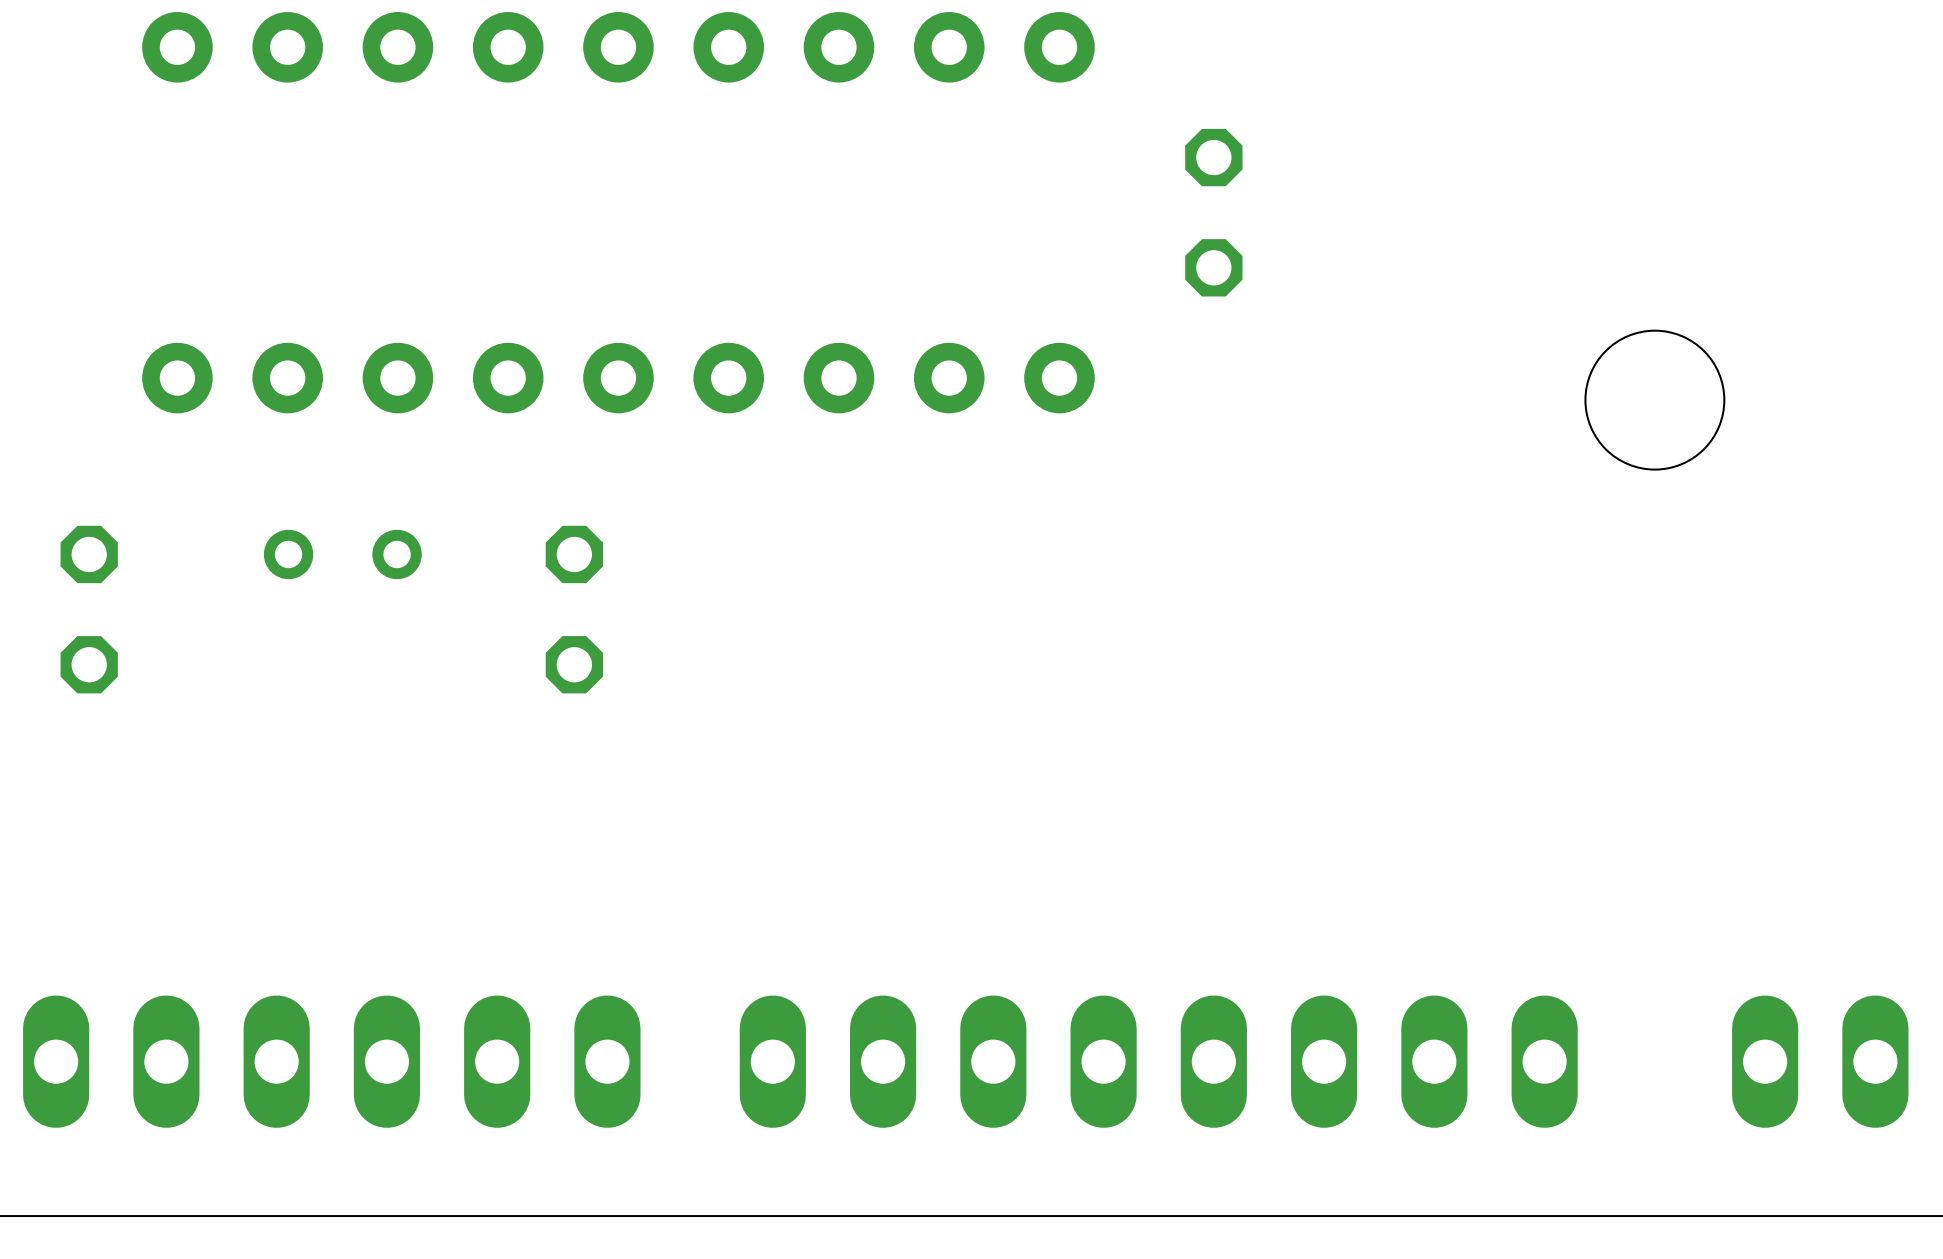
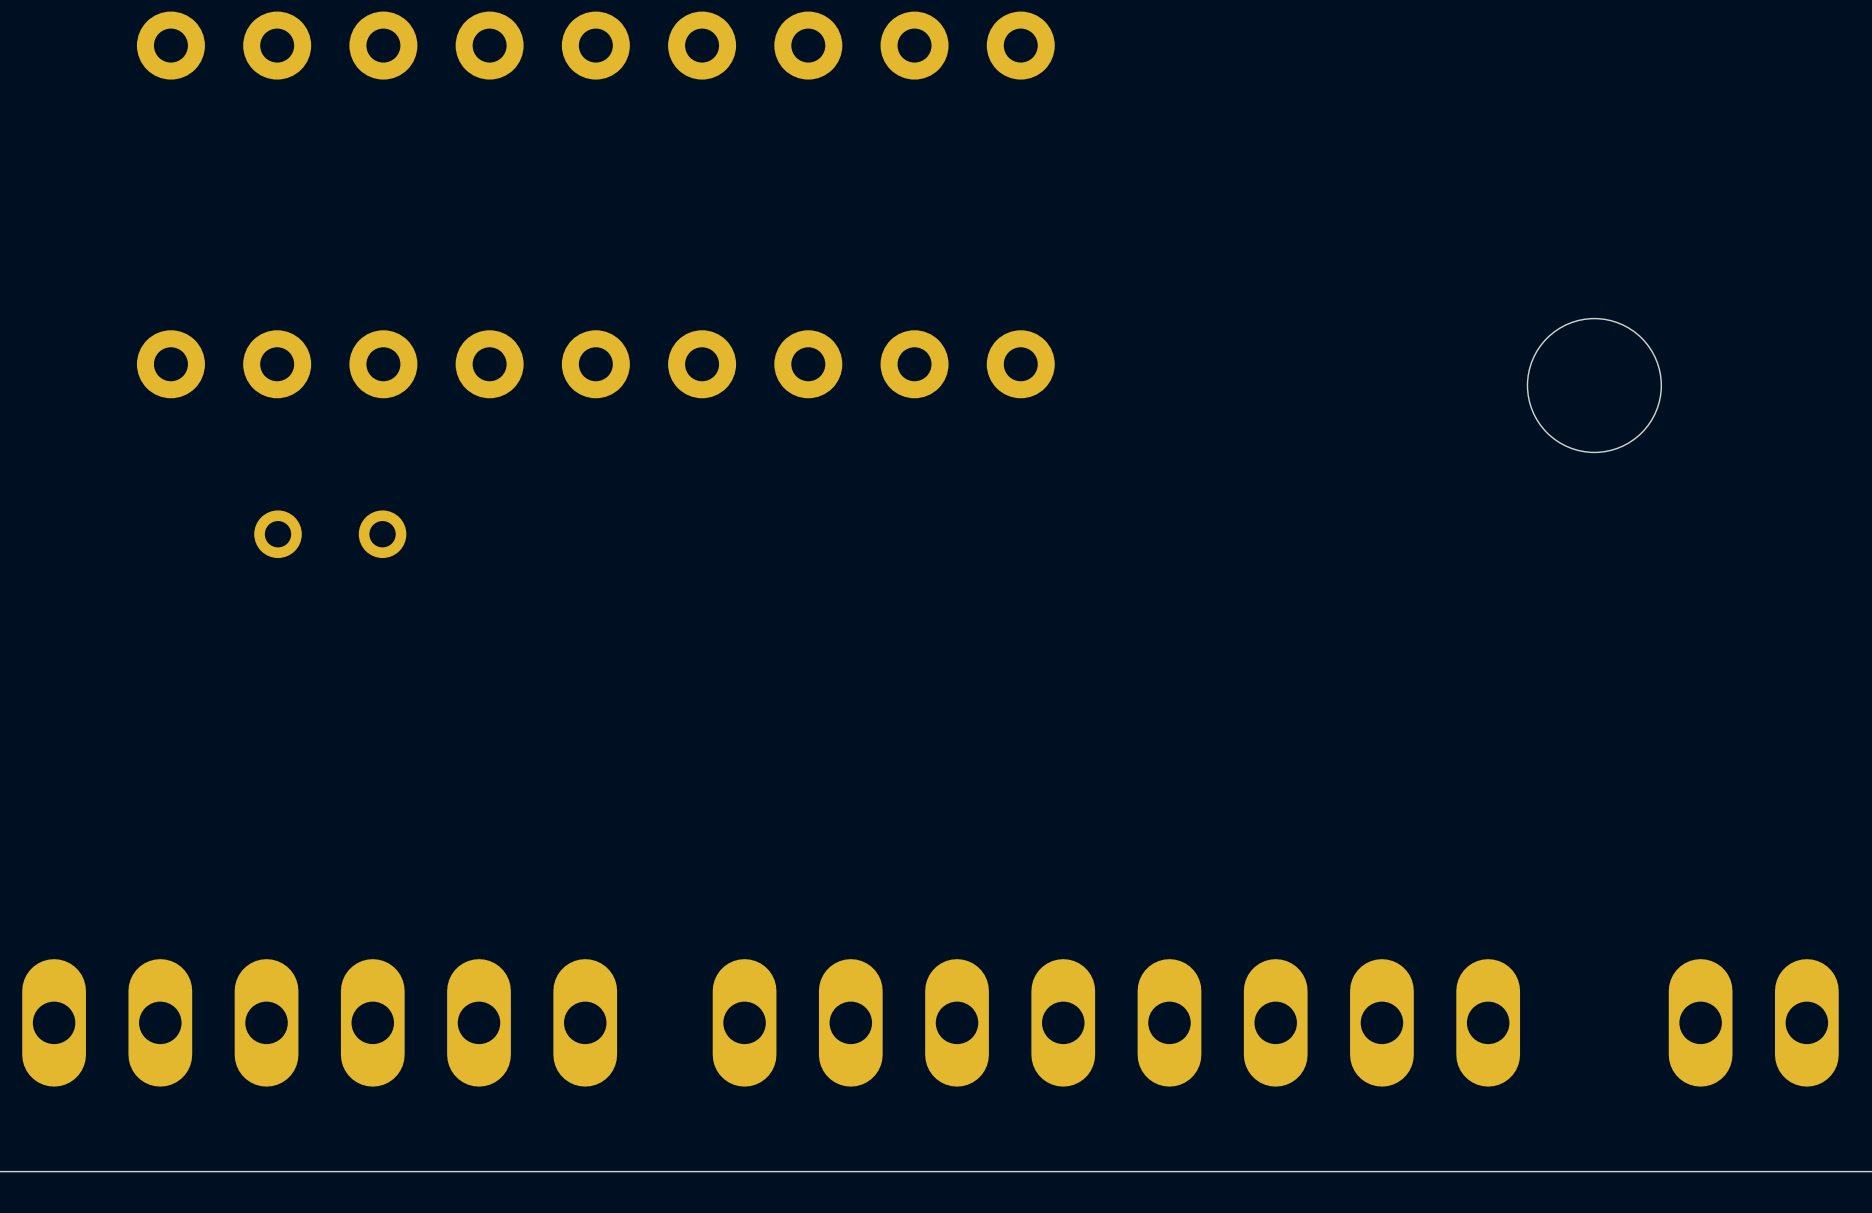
part: (1213, 212) -> none
part: (89, 609) -> none
part: (574, 609) -> none

